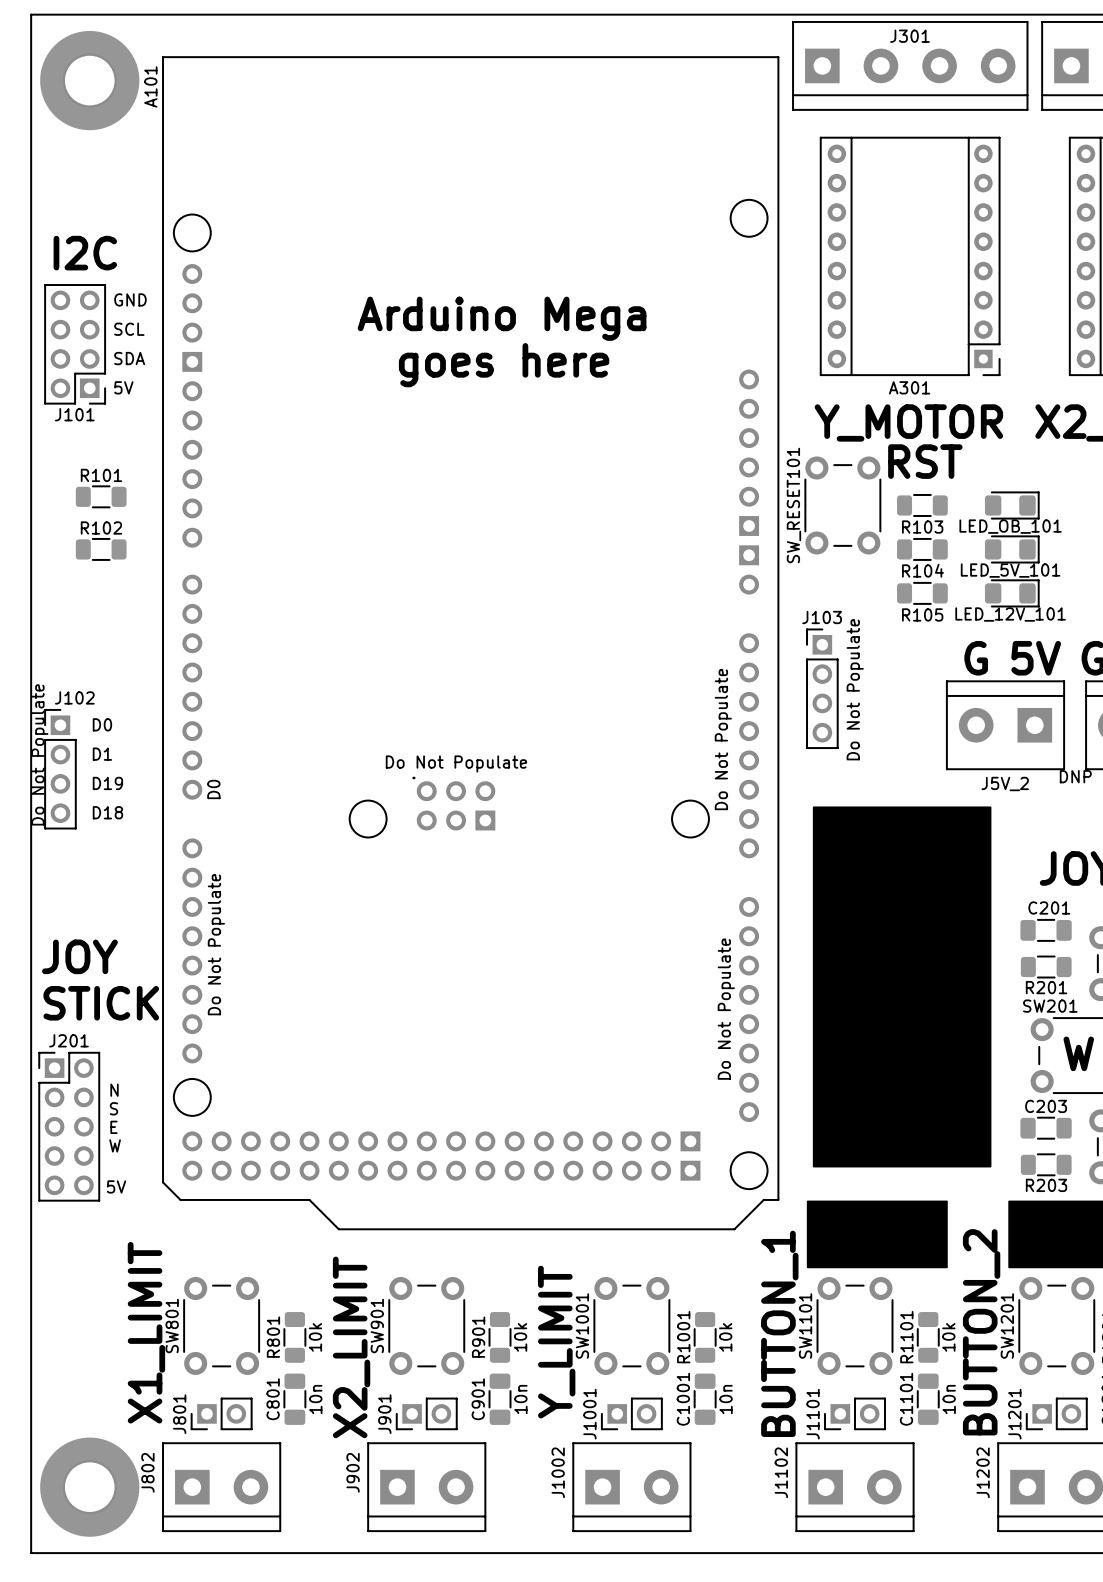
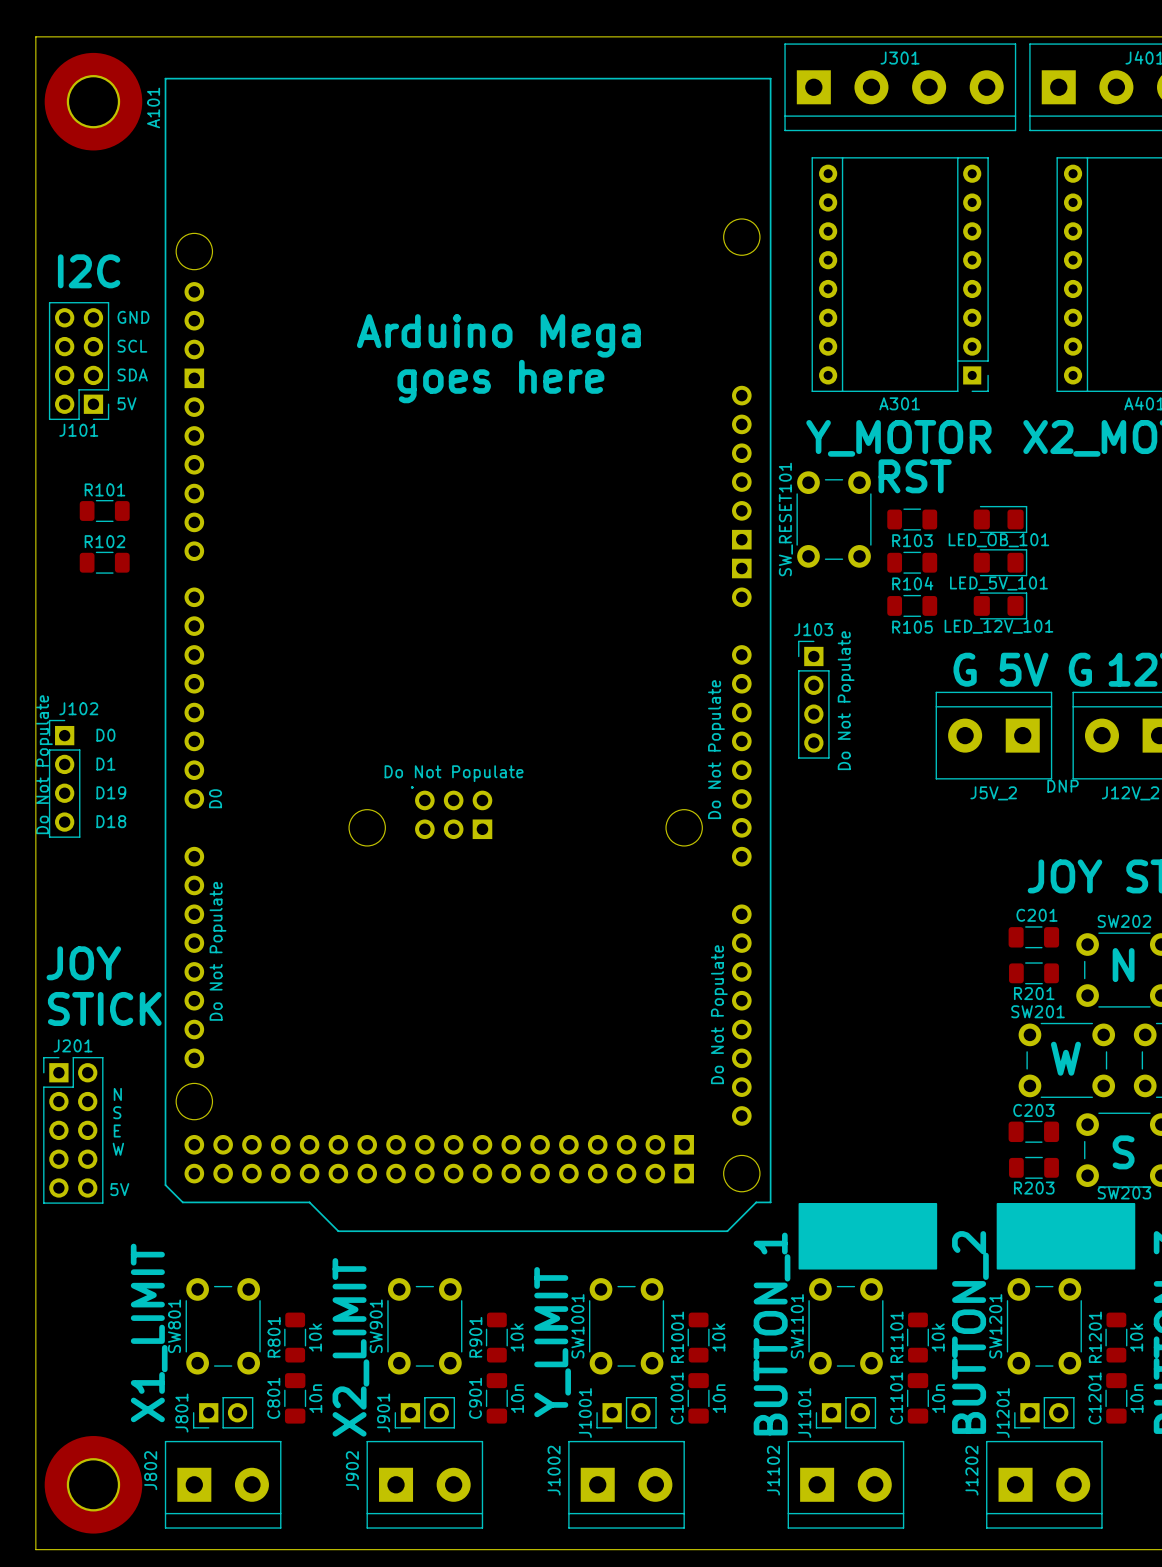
drawing: [812, 806, 992, 1168] -> none

